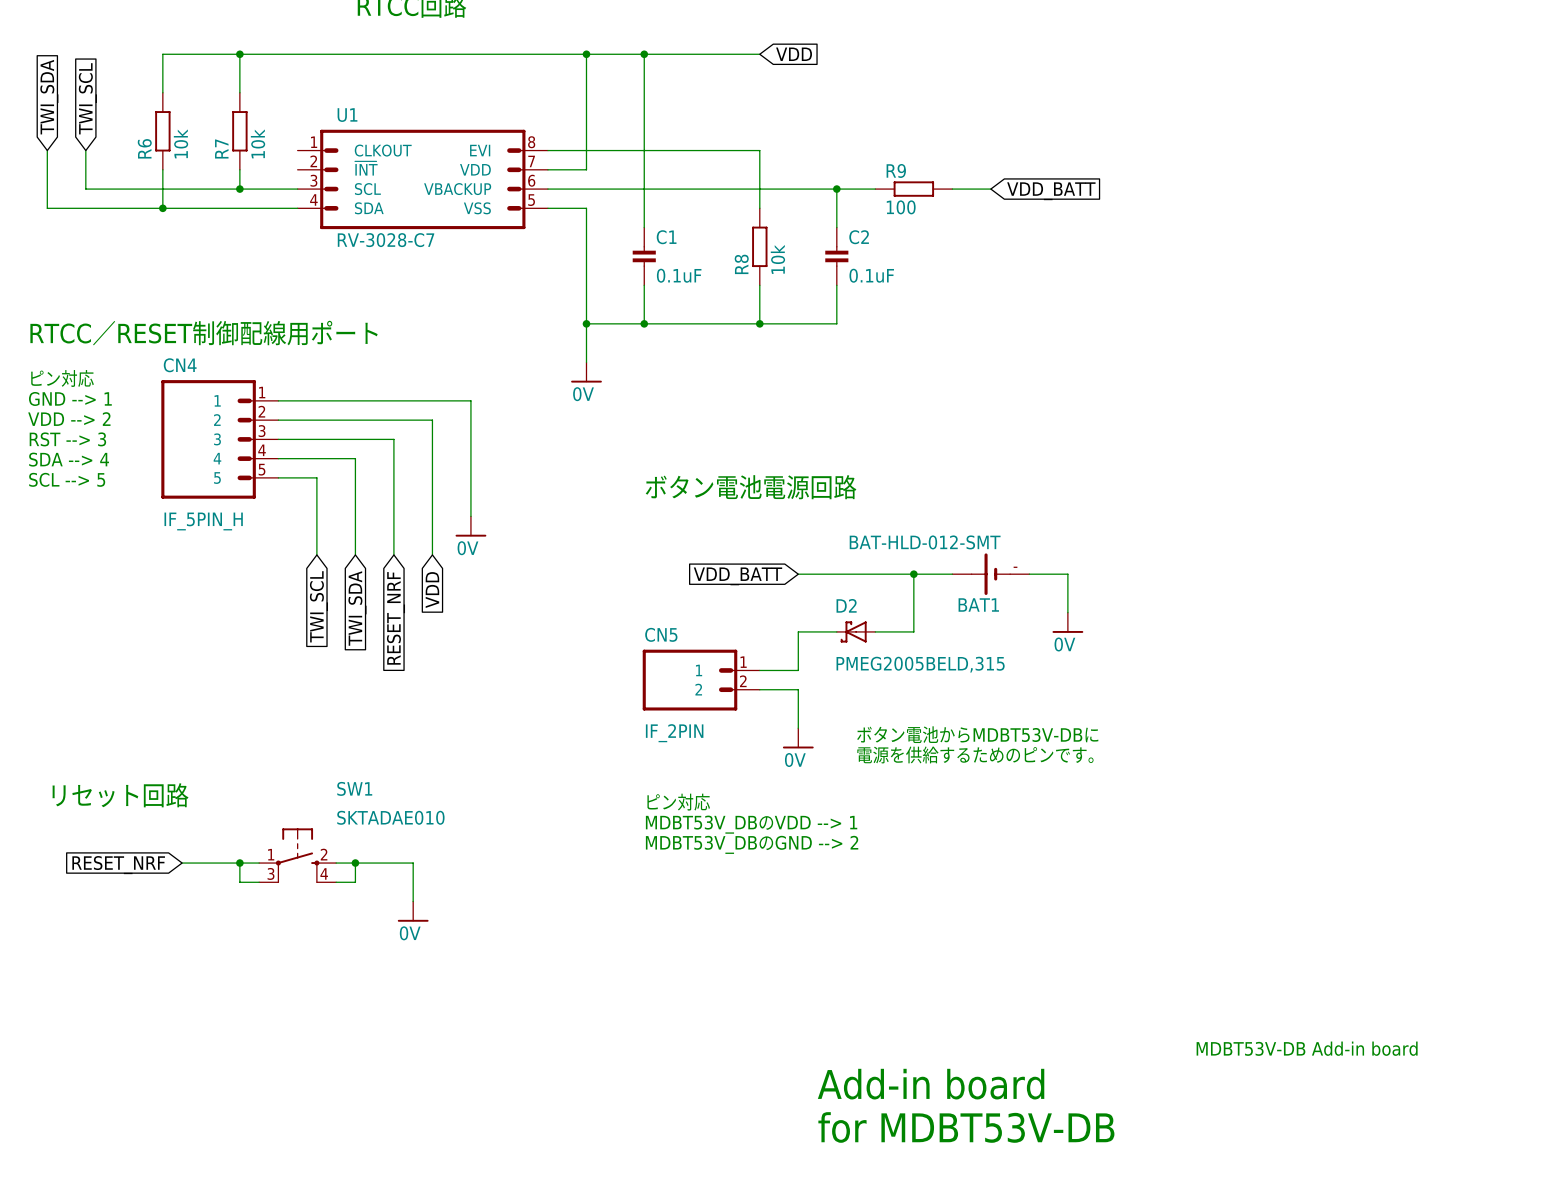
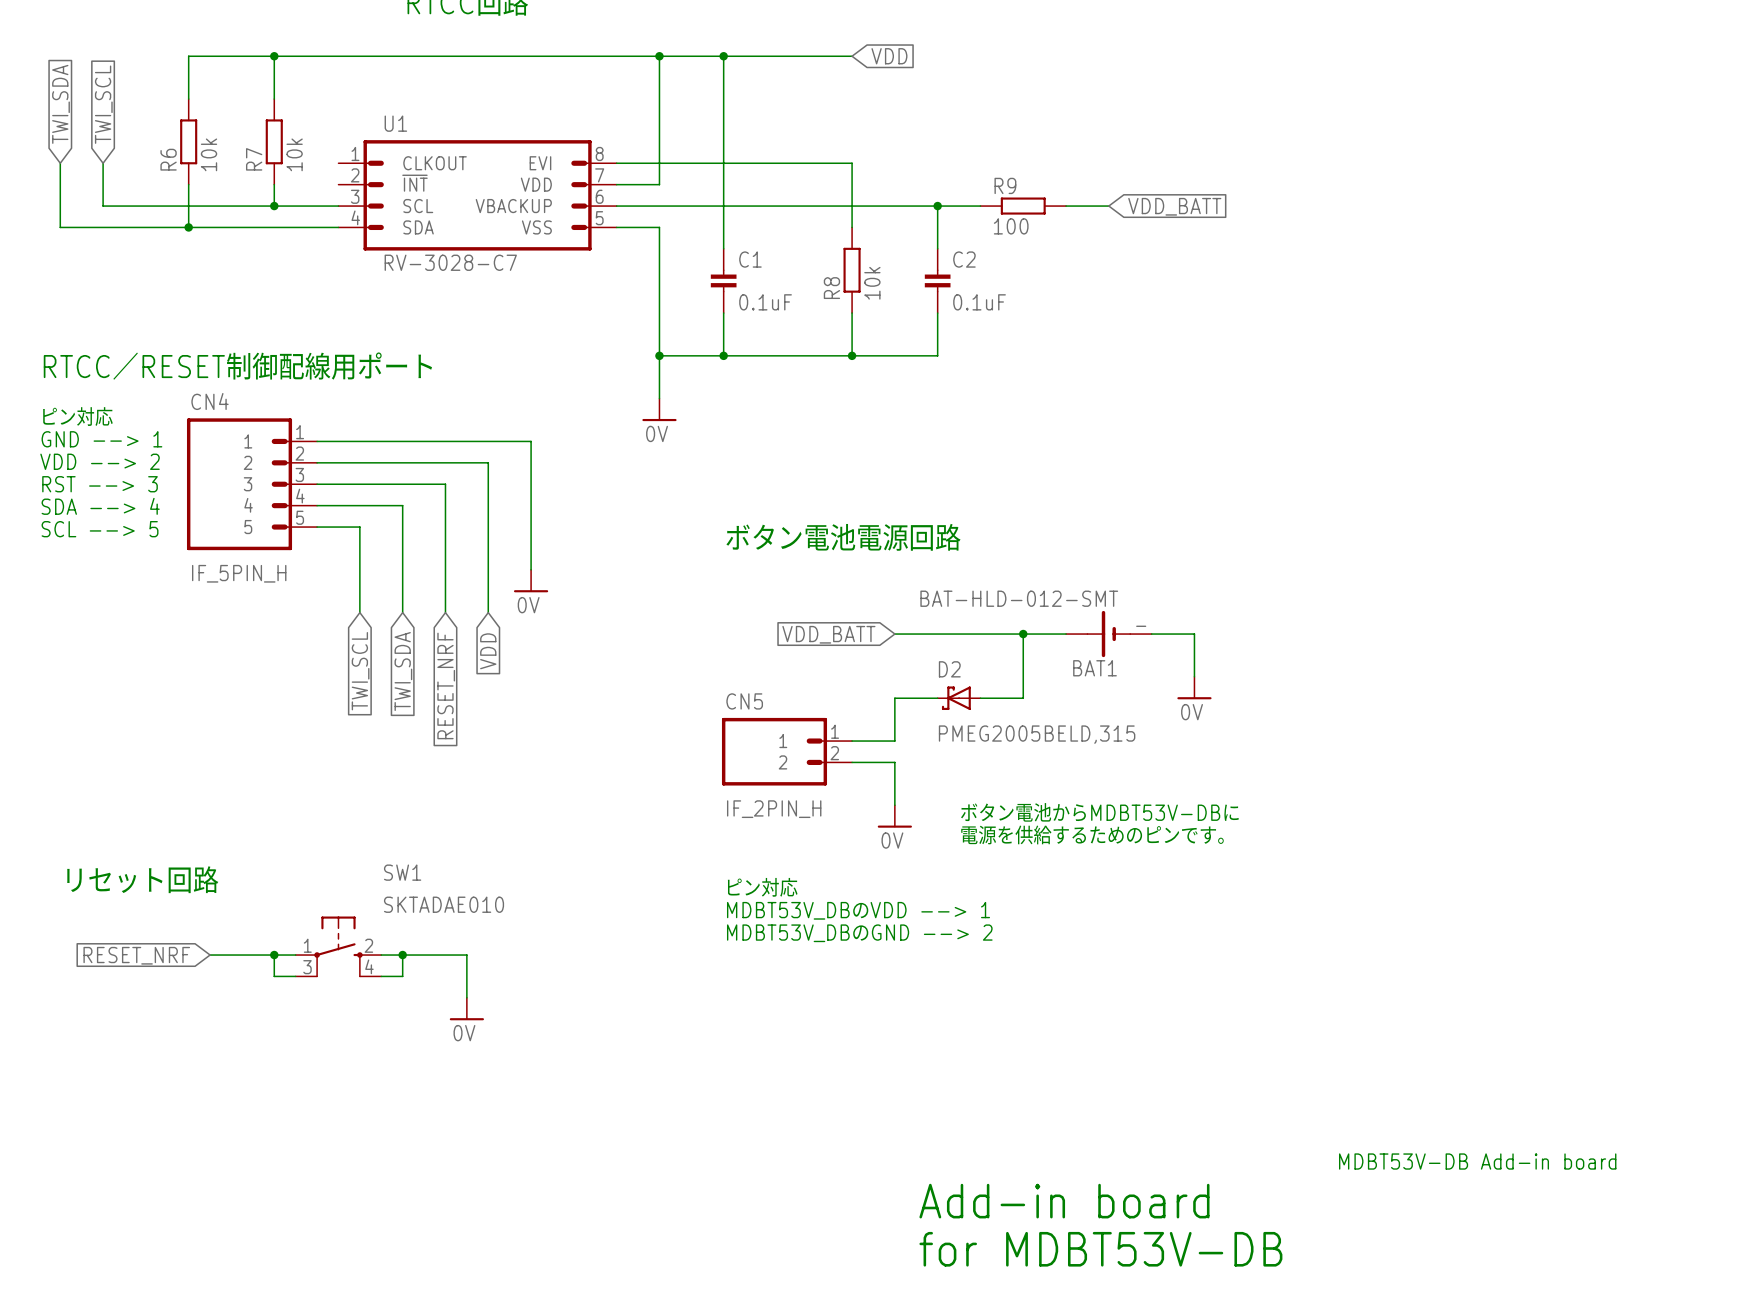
CN5 value: IF_2PIN (674, 733) -> IF_2PIN_H (774, 809)

